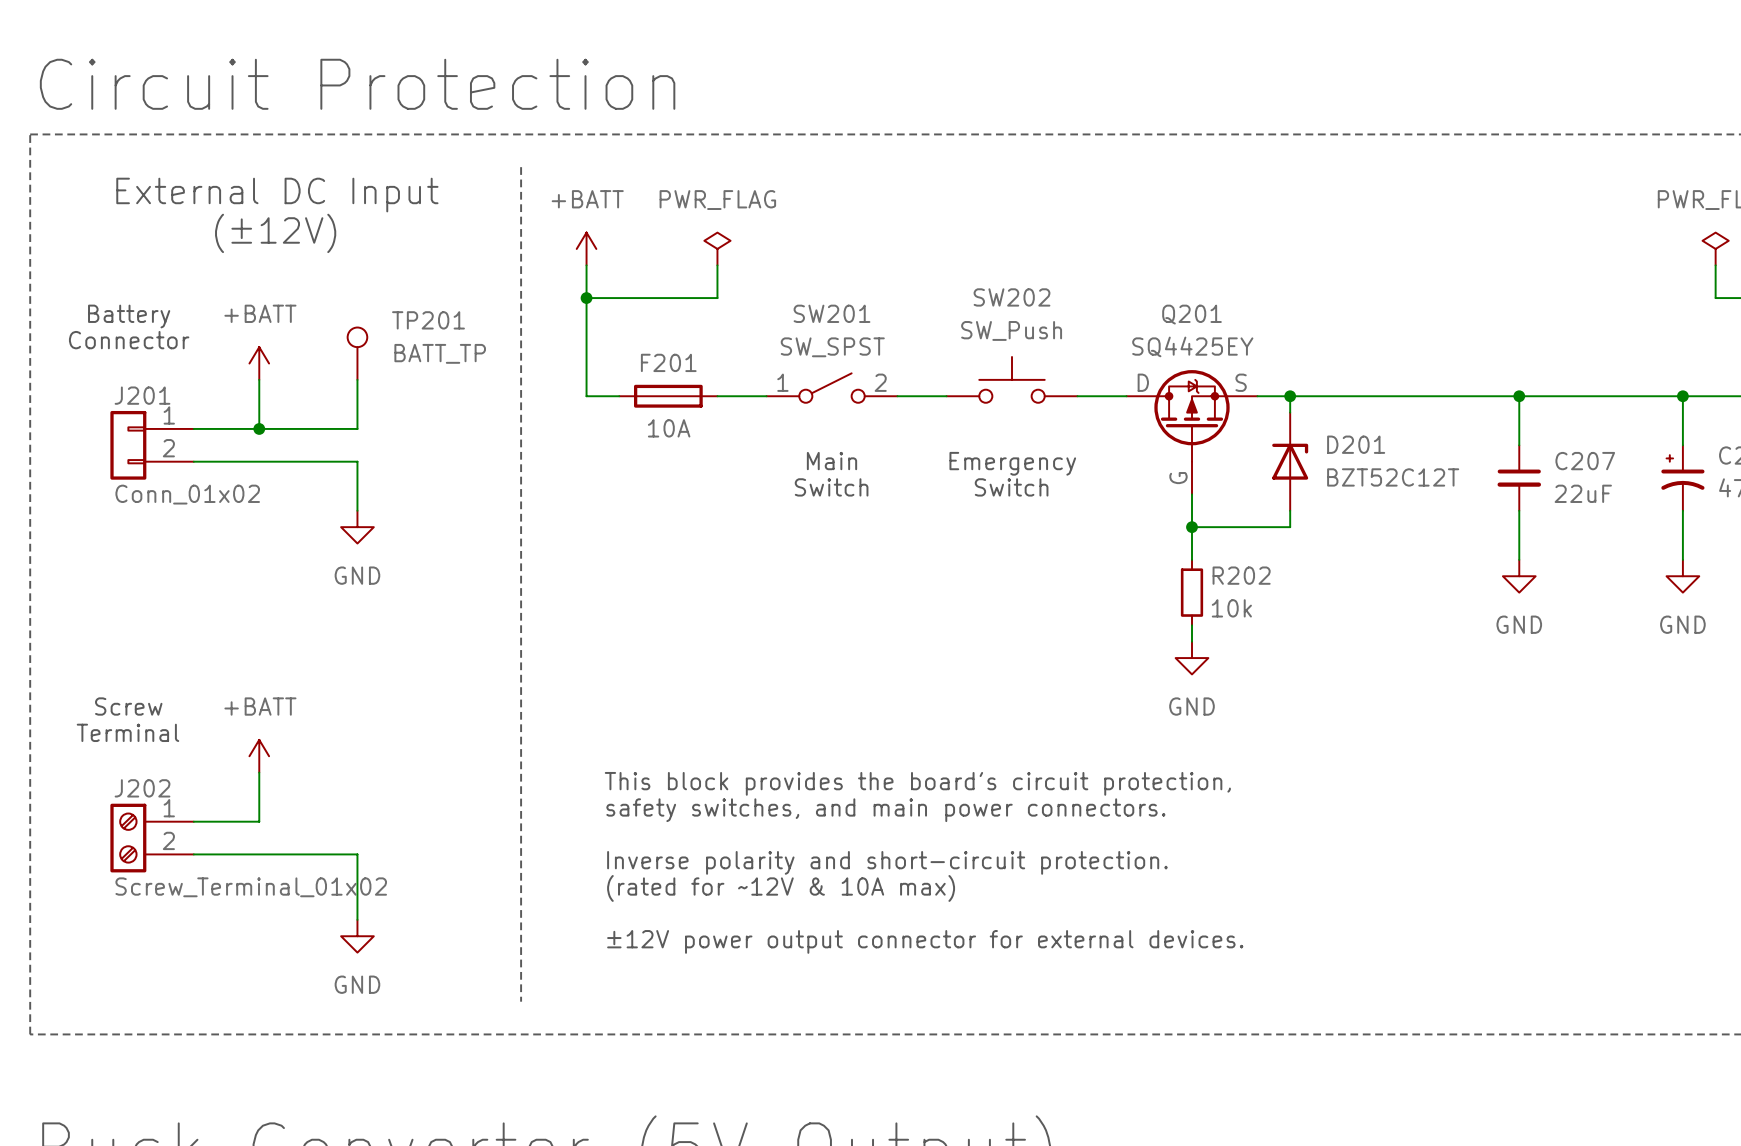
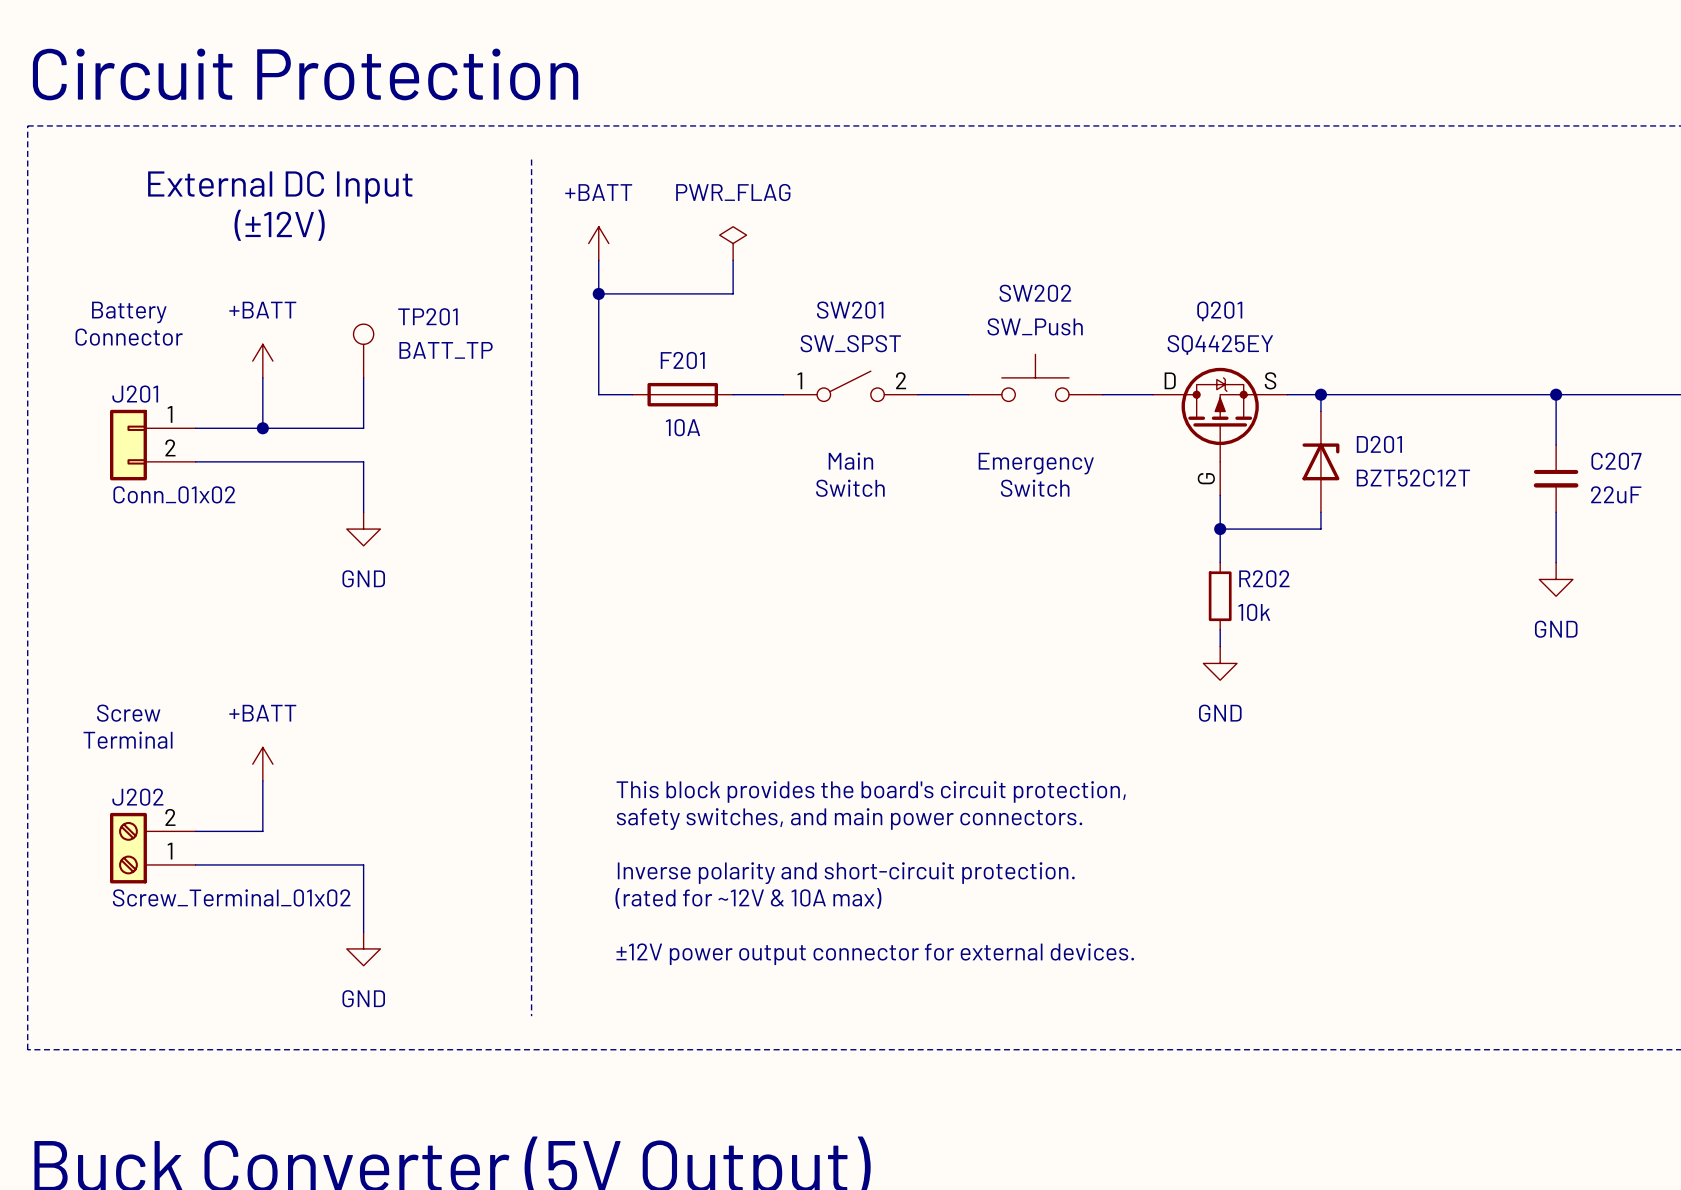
J202 flip: as is (128, 838) -> up-down (128, 848)

